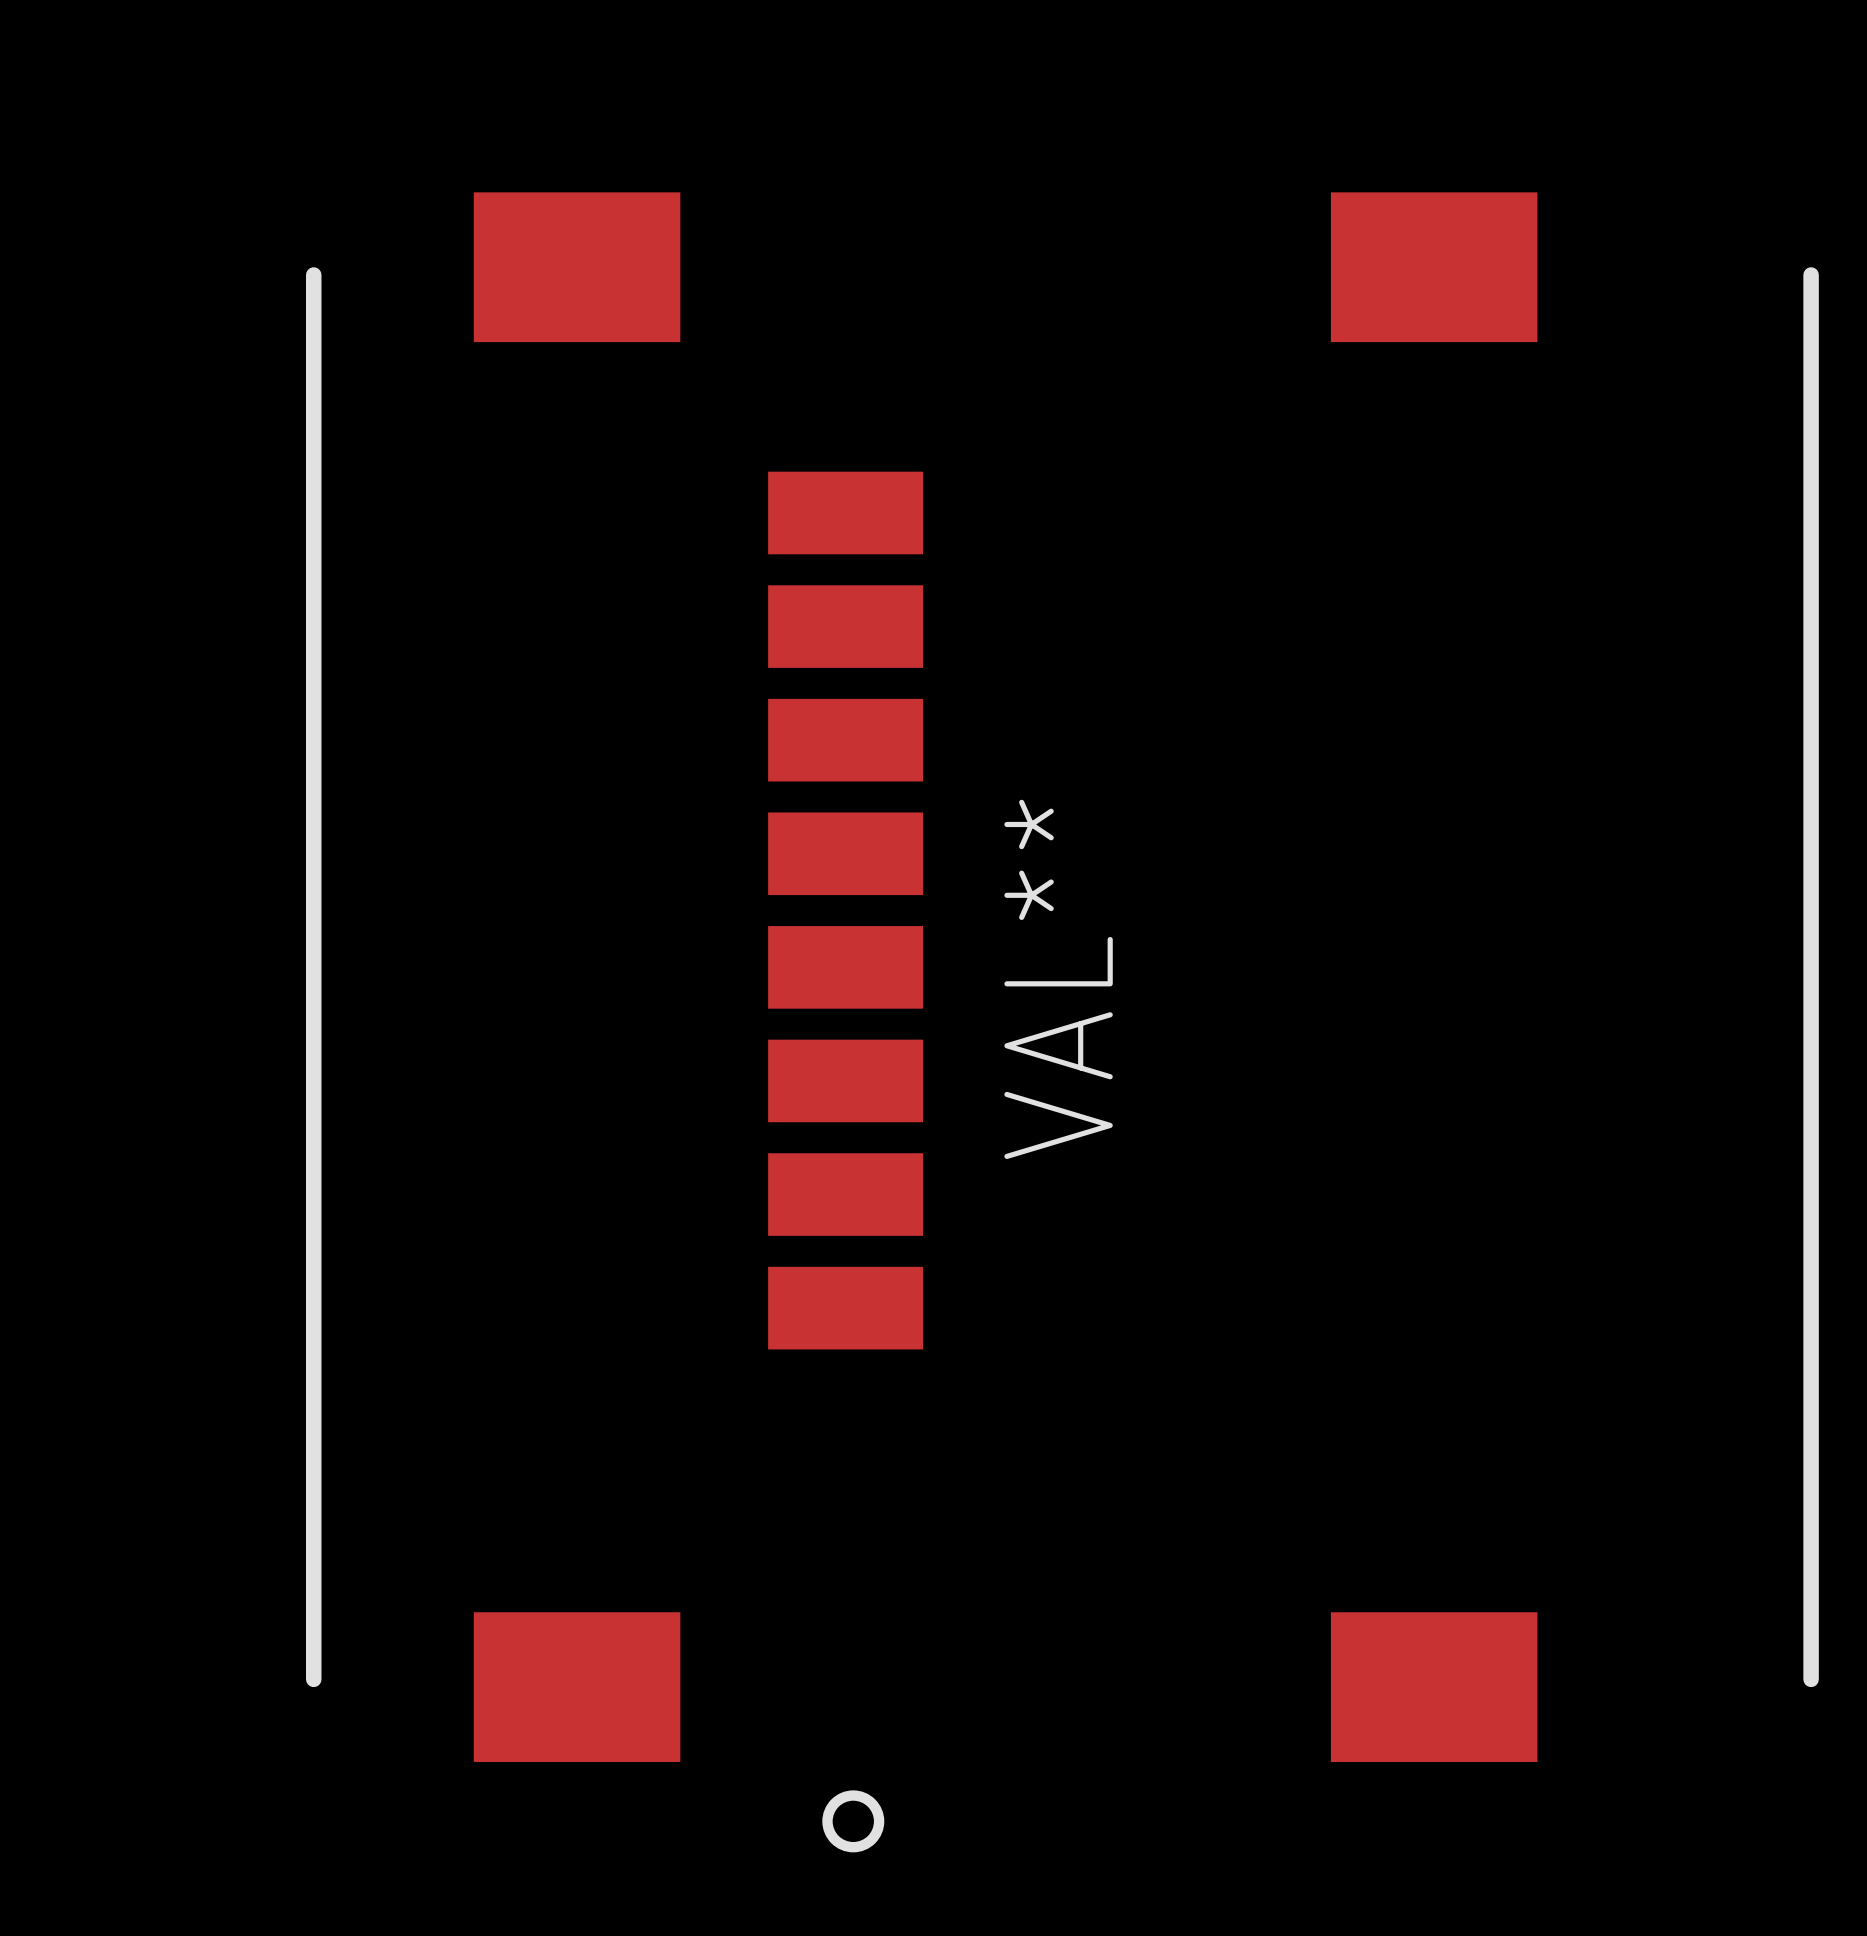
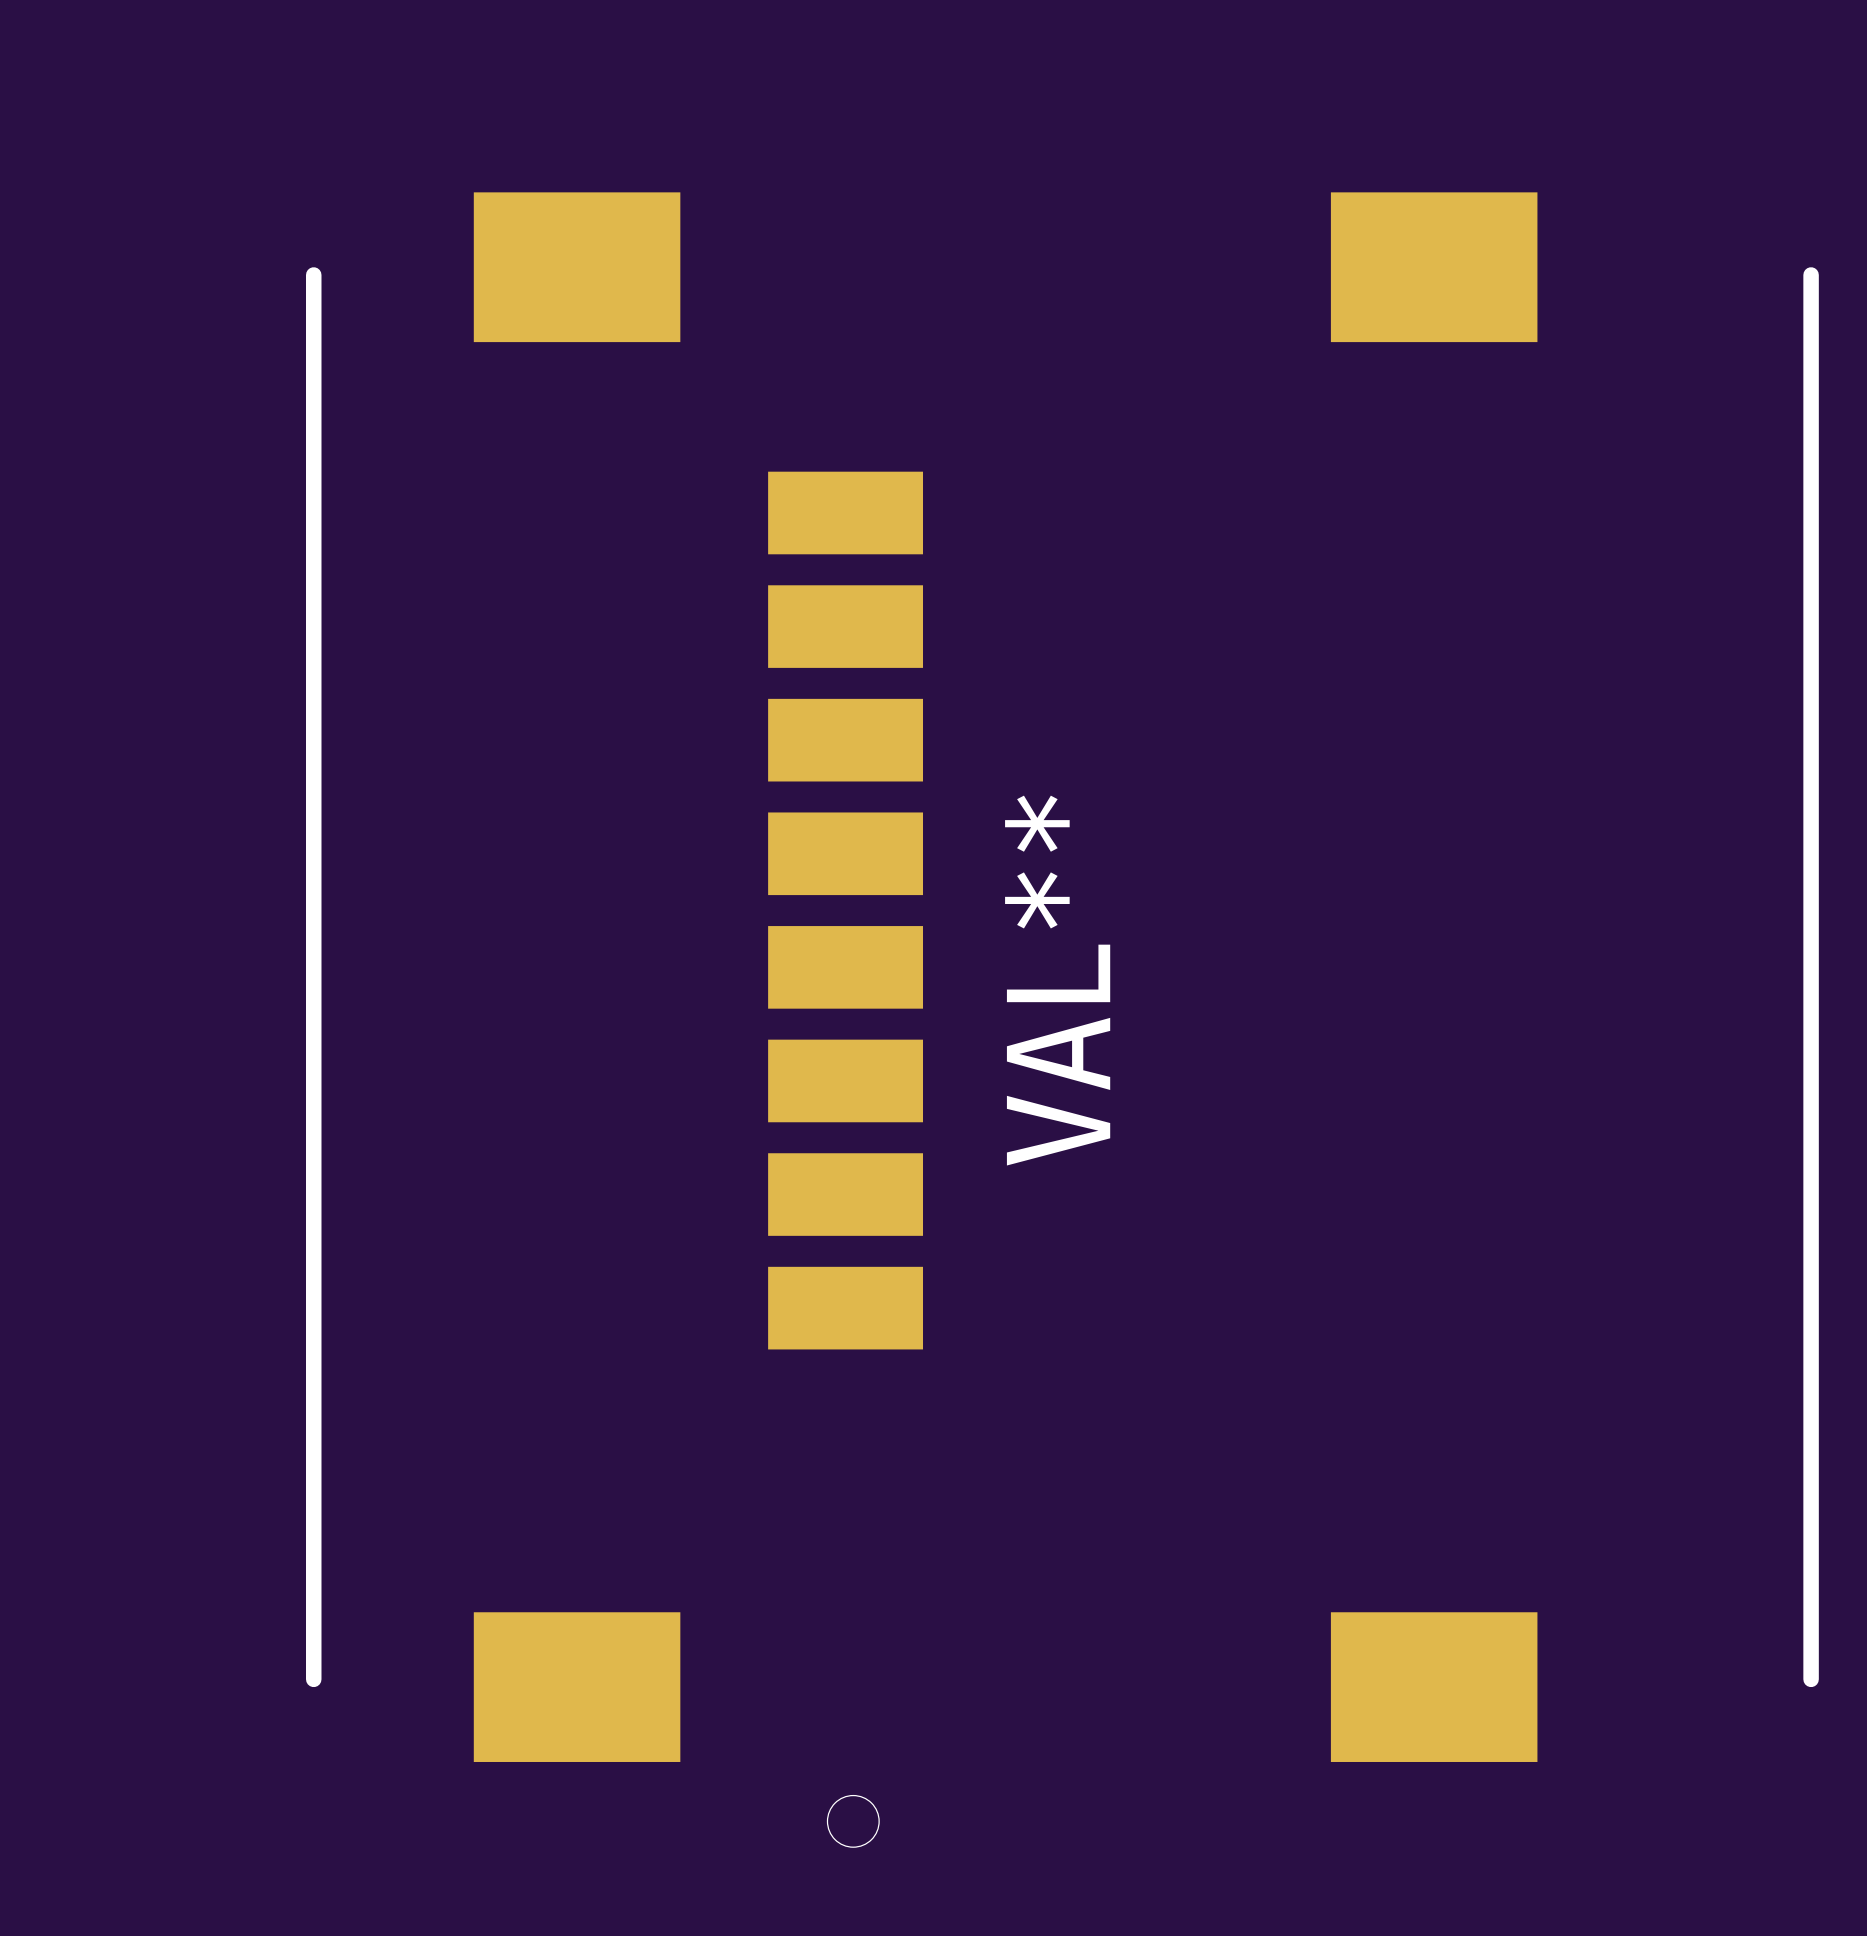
part footprint: [306, 192, 1819, 1853] -> [306, 192, 1819, 1848]

